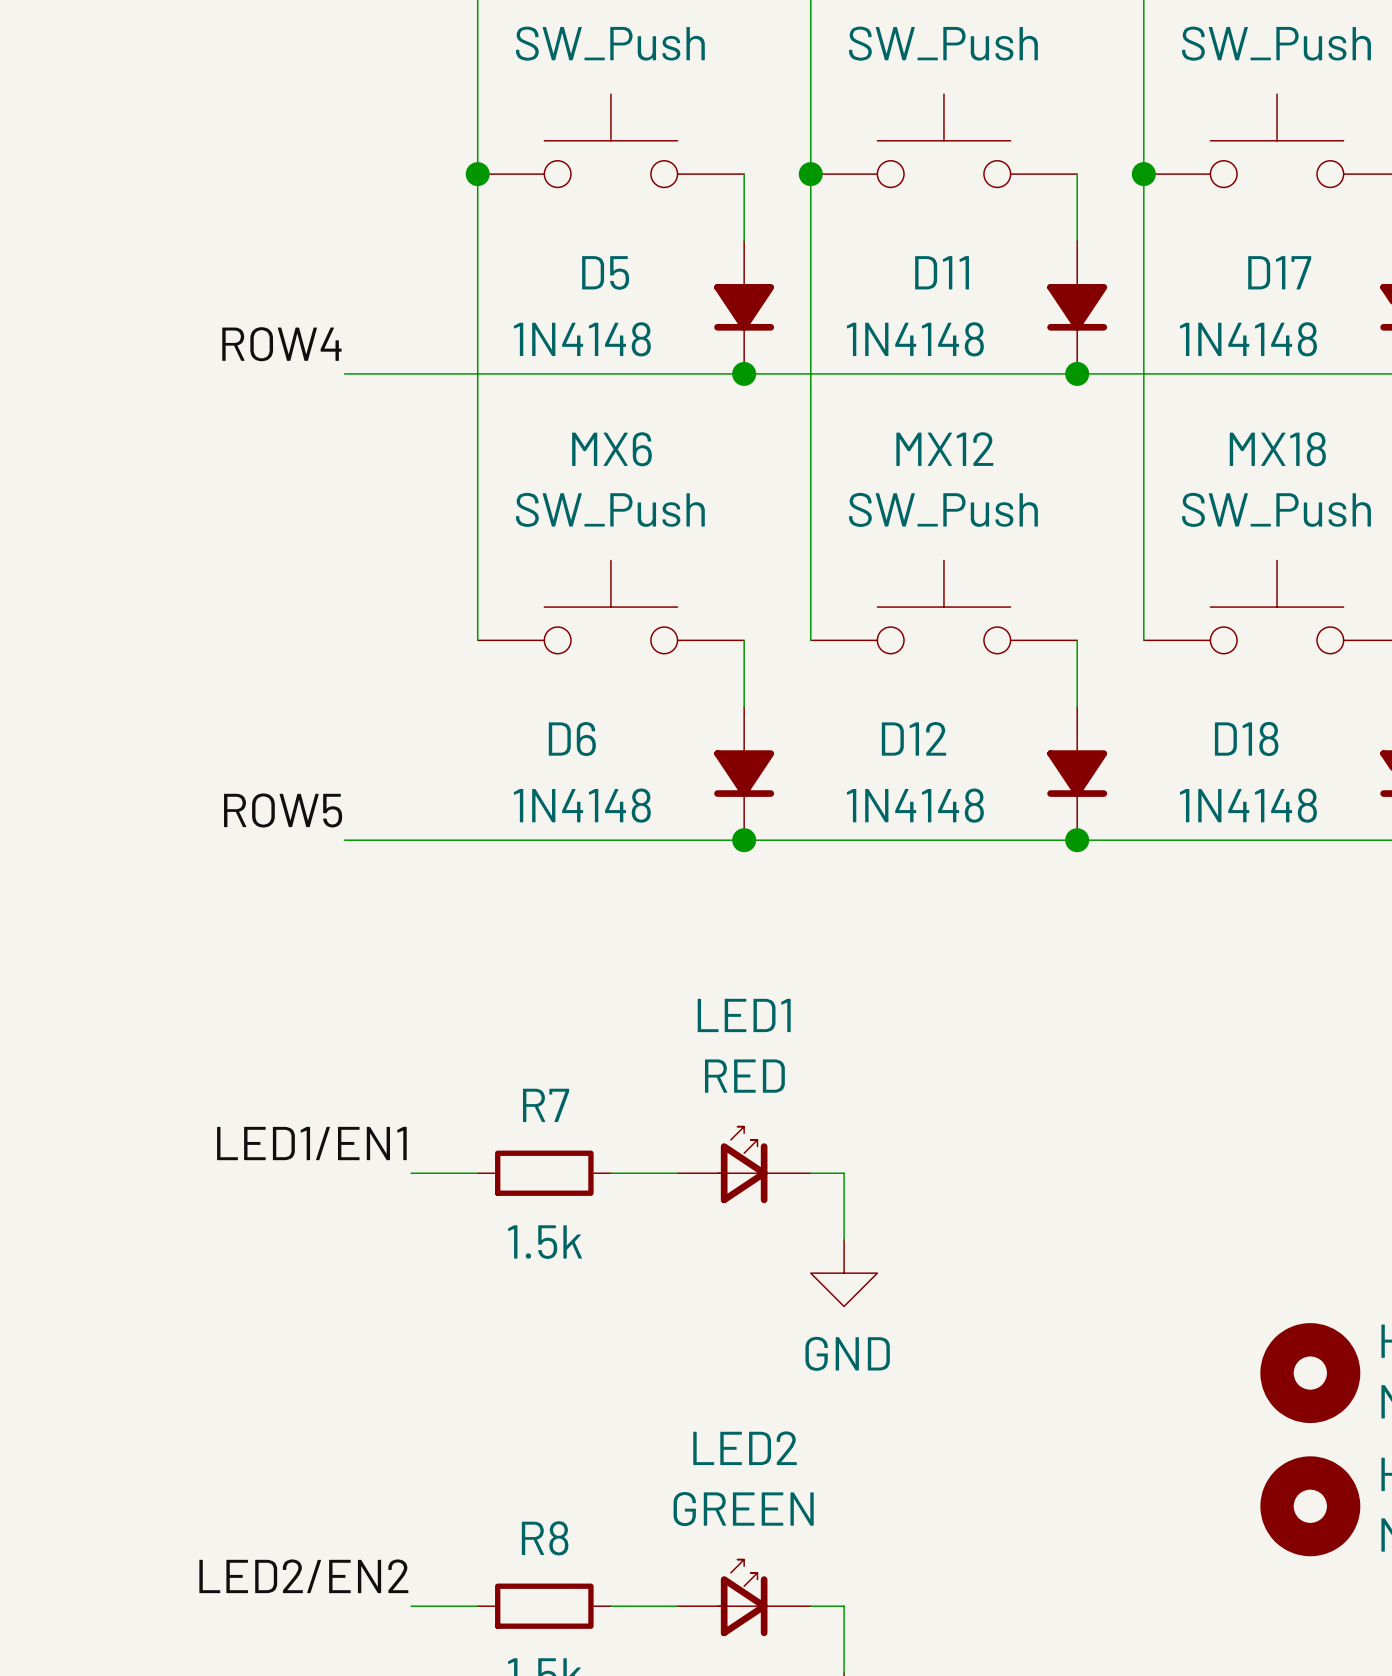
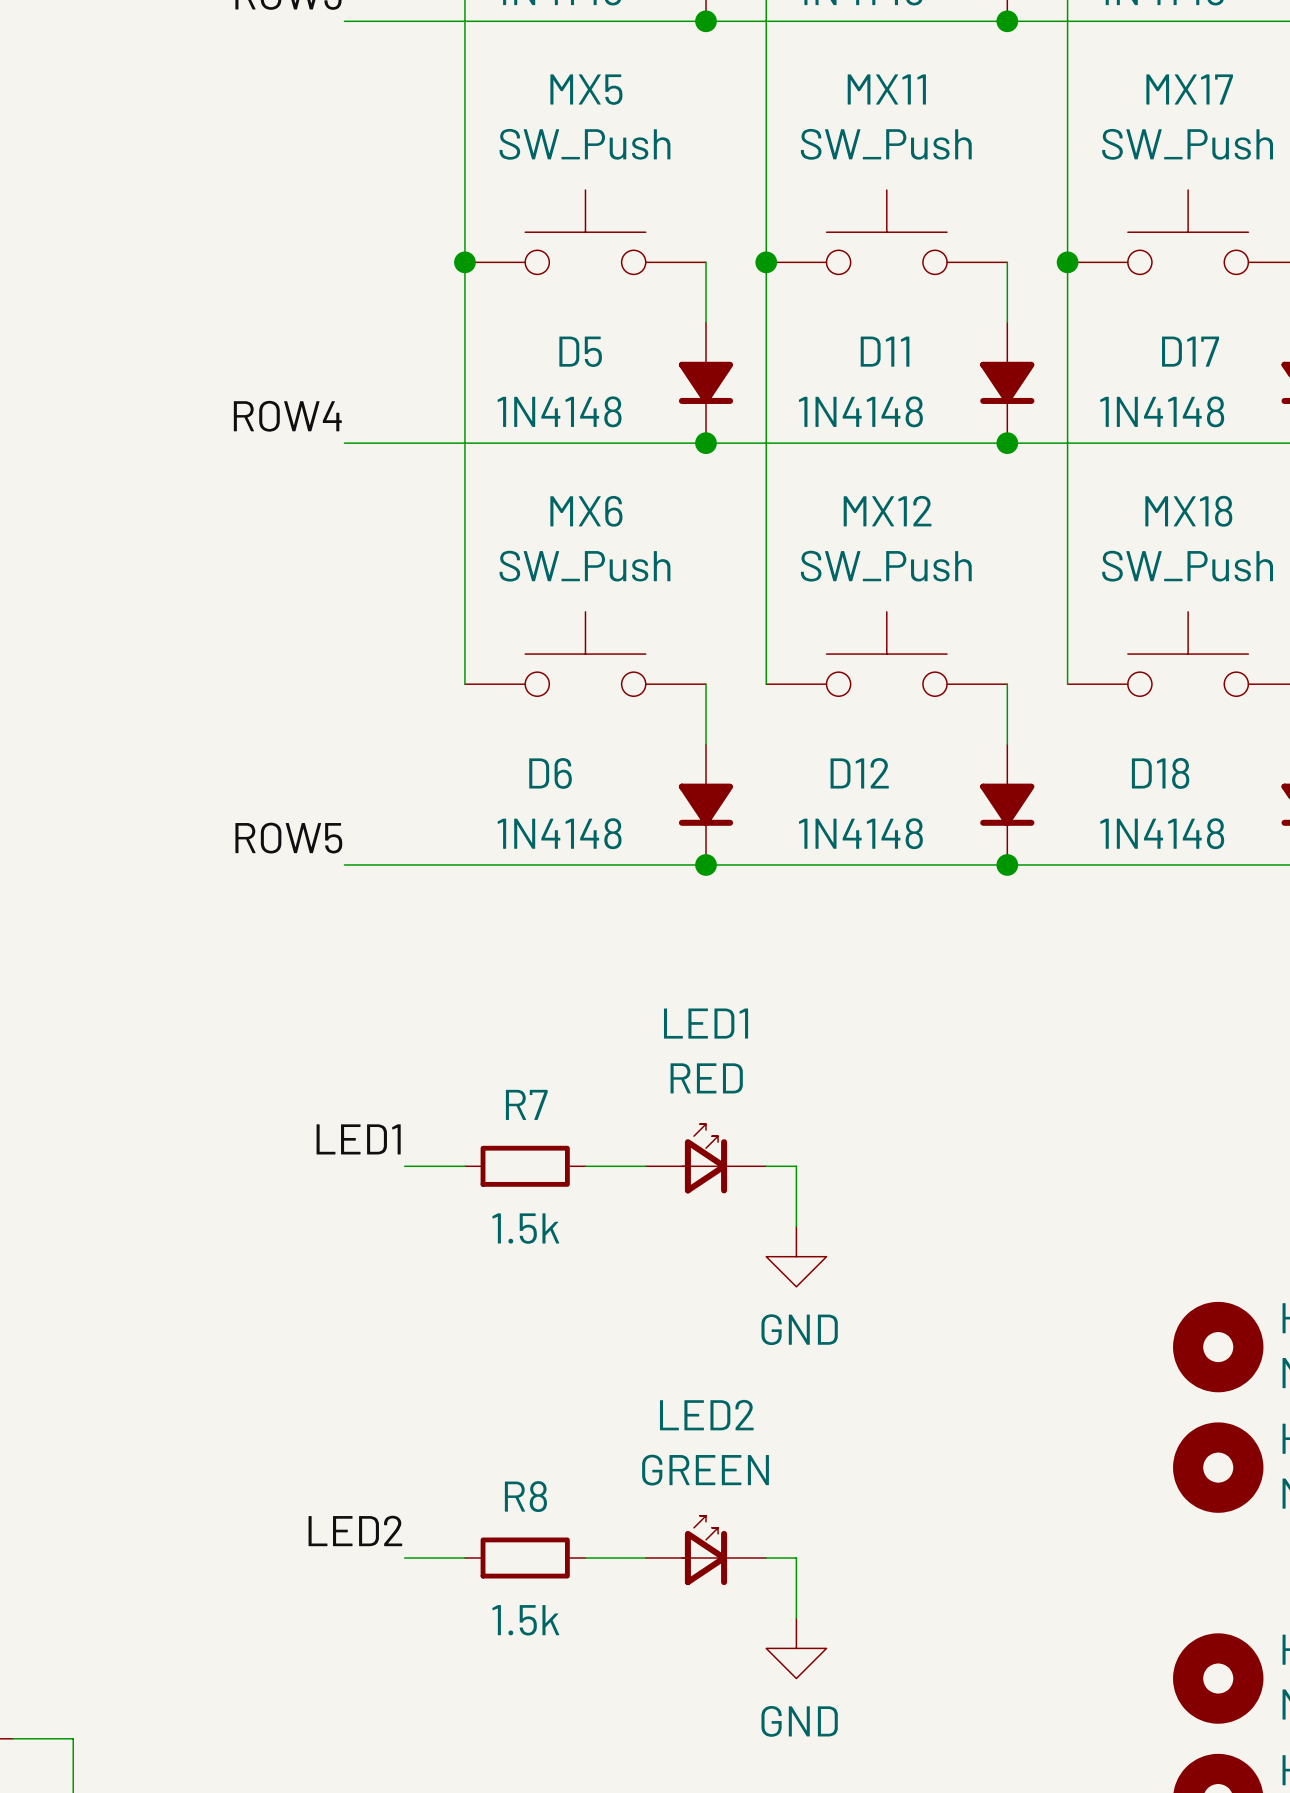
label: LED1/EN1 (311, 1143) -> LED1 (358, 1139)
label: LED2/EN2 (303, 1576) -> LED2 (355, 1530)

